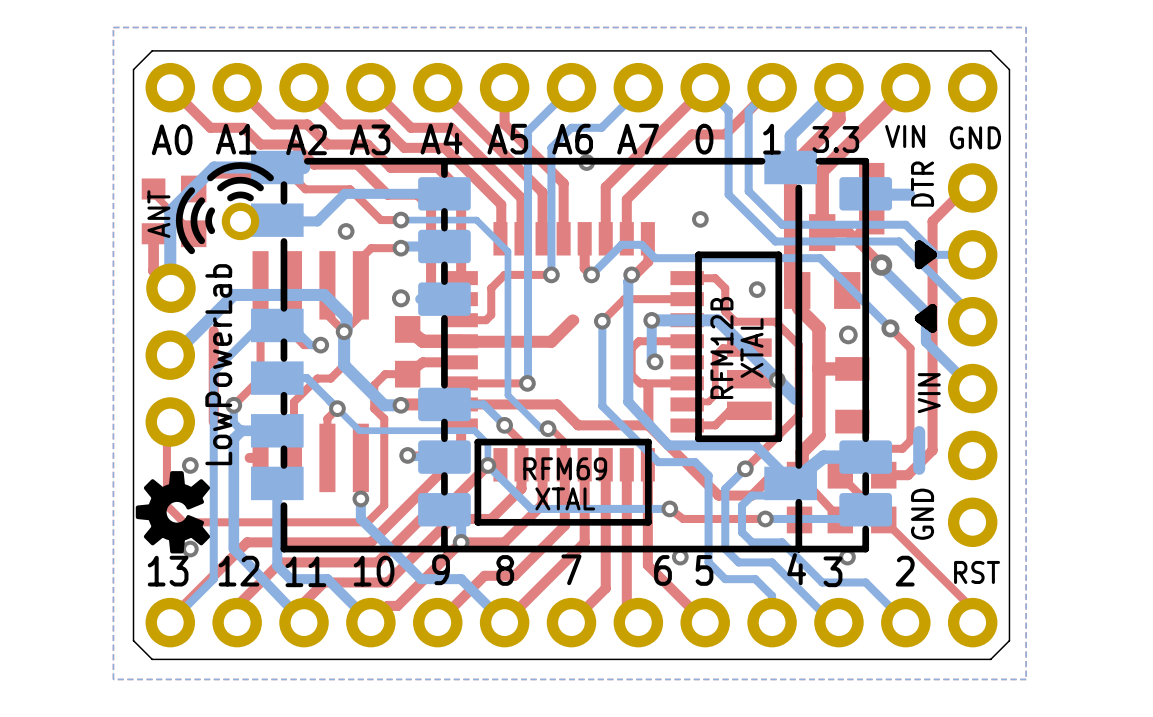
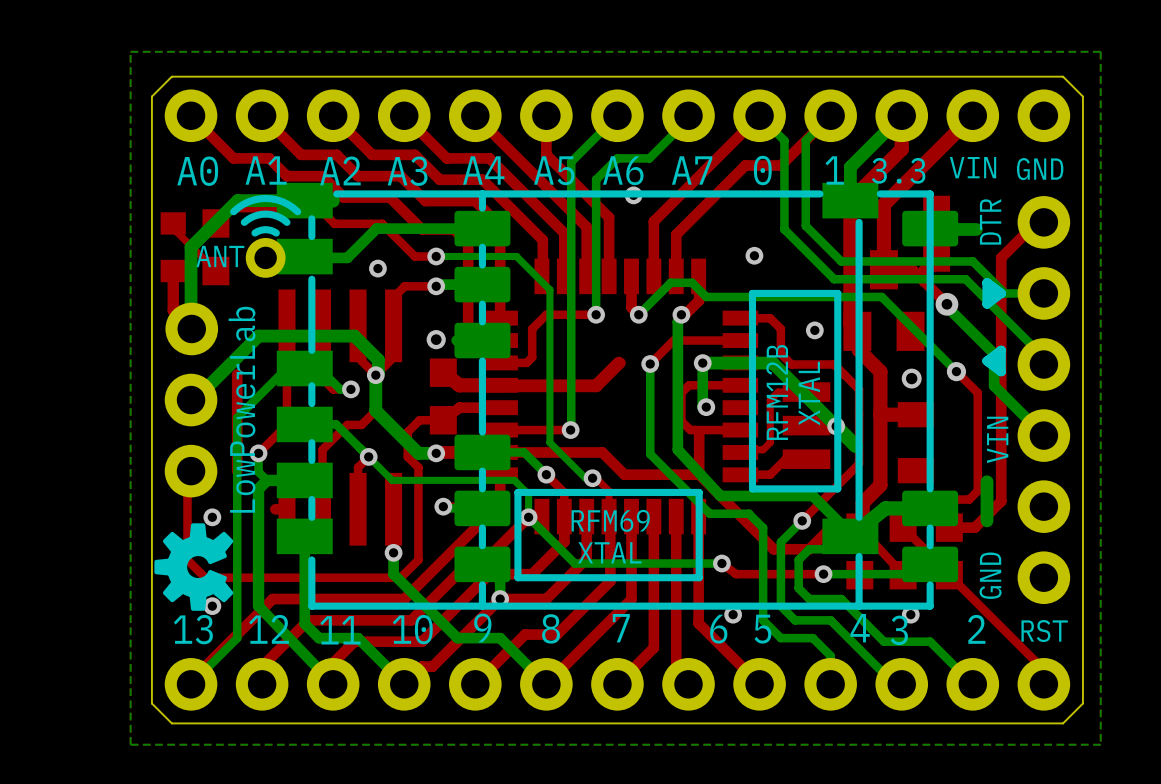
line: (191, 190) (182, 204) (179, 220) (182, 237) (191, 250) -> none
line: (201, 200) (195, 209) (193, 220) (195, 231) (201, 240) -> none
line: (211, 210) (208, 220) (211, 230) -> none
text rotation: 0° (158, 214) -> 90° clockwise (220, 256)

